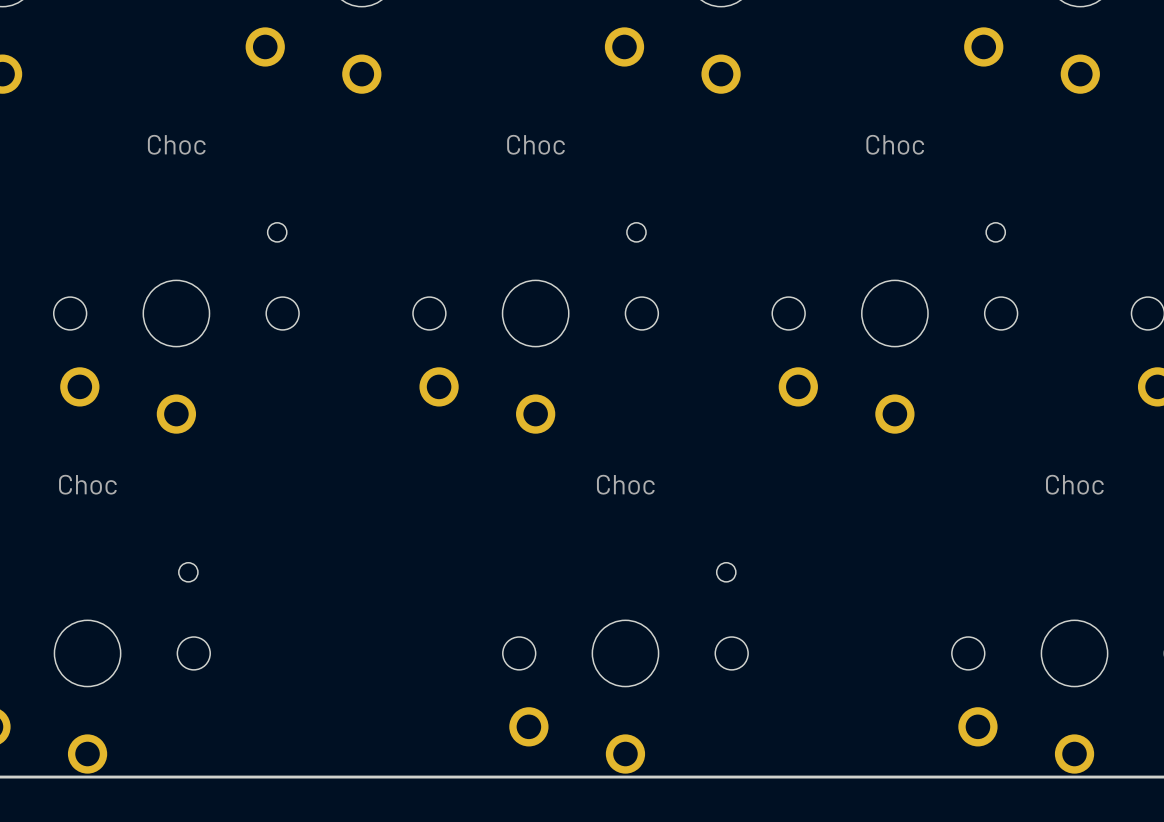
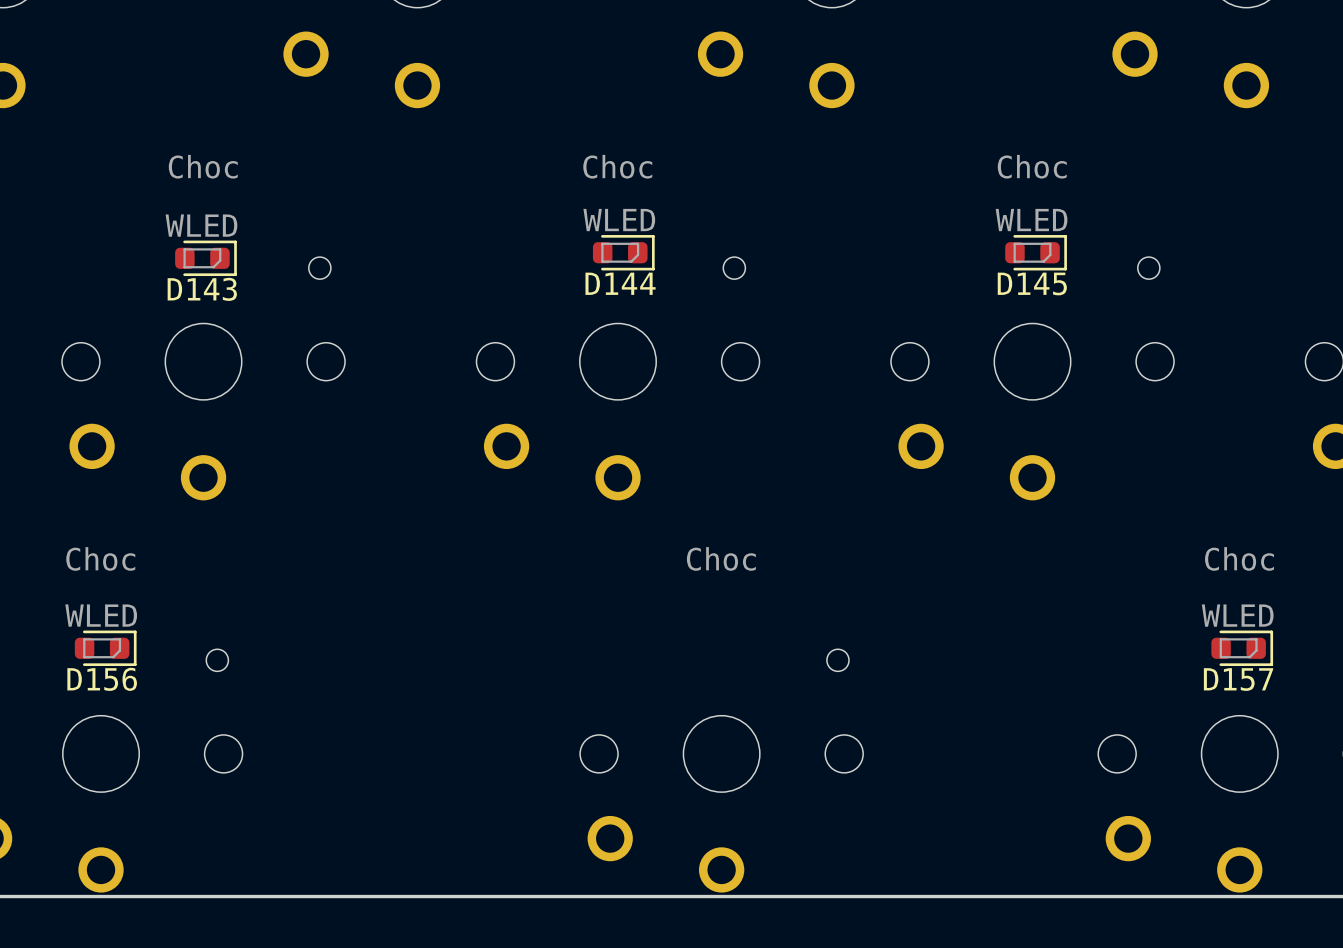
D144: none -> WLED (623, 252)
D145: none -> WLED (1036, 252)
D143: none -> WLED (205, 258)
D156: none -> WLED (105, 648)
D157: none -> WLED (1242, 648)

